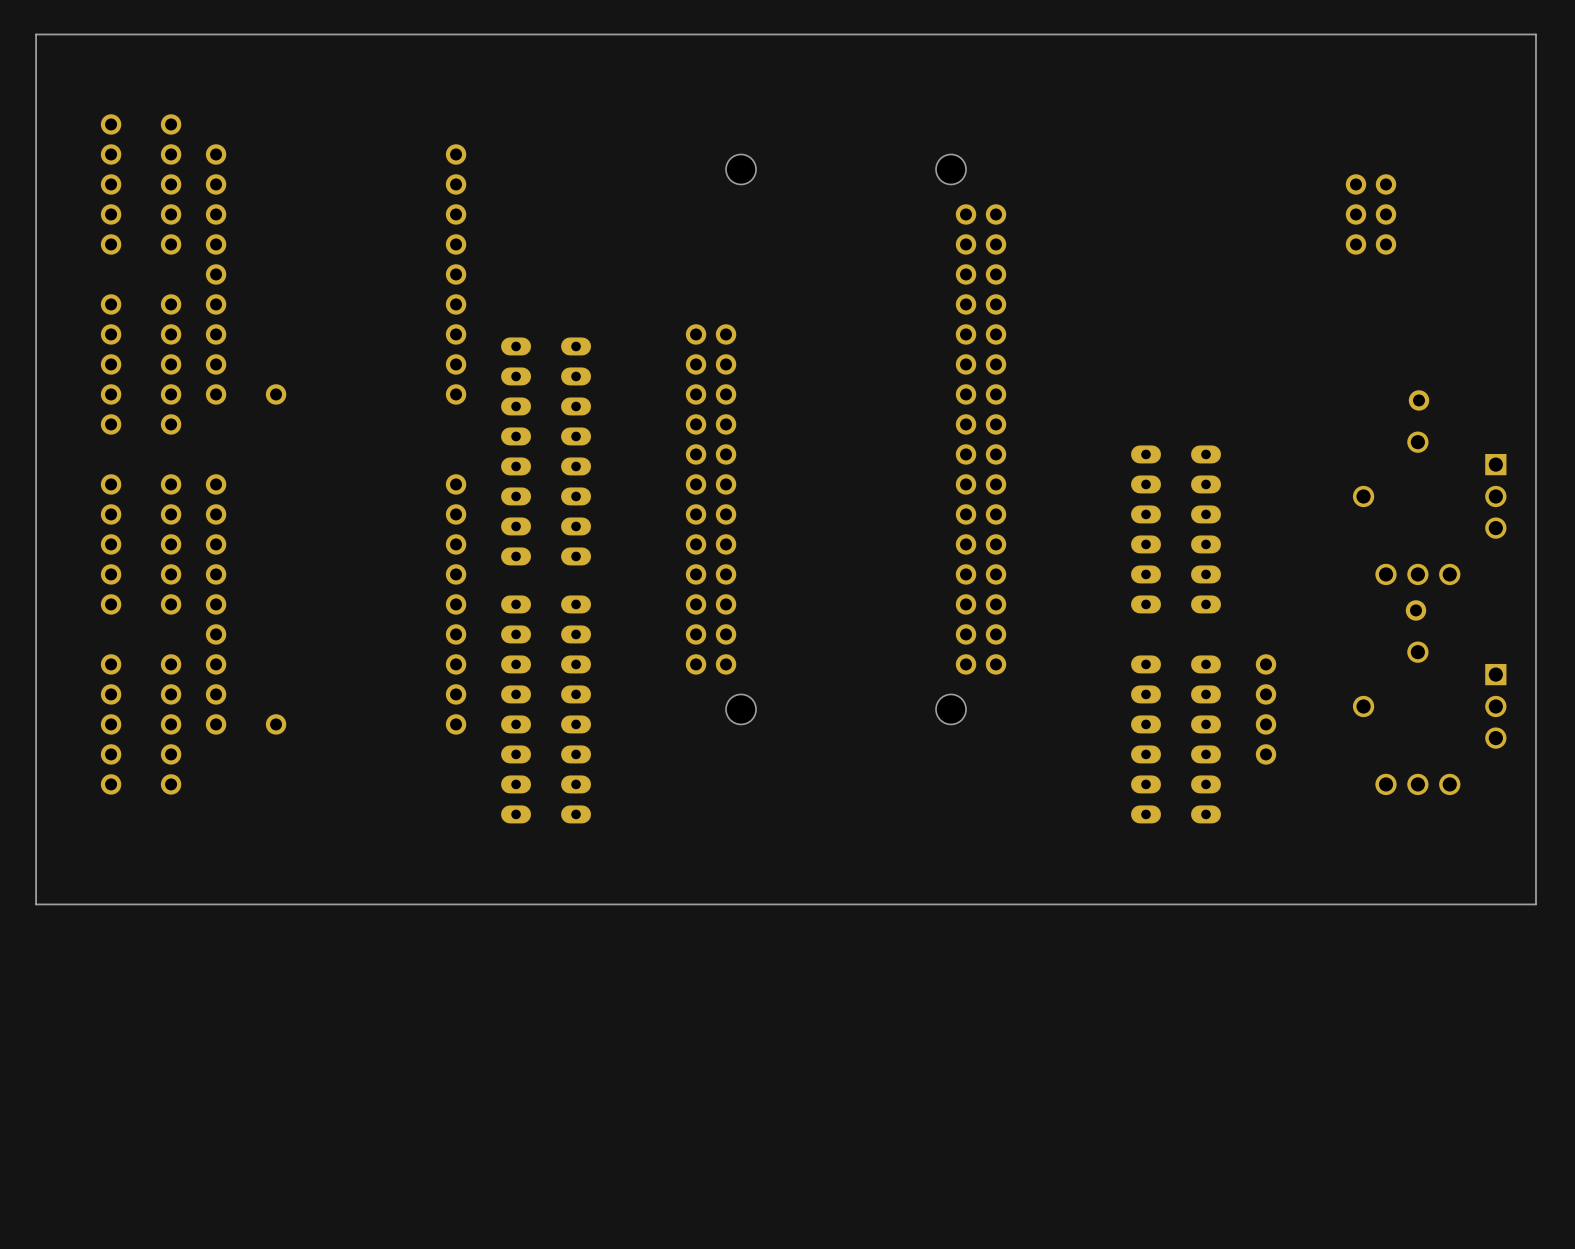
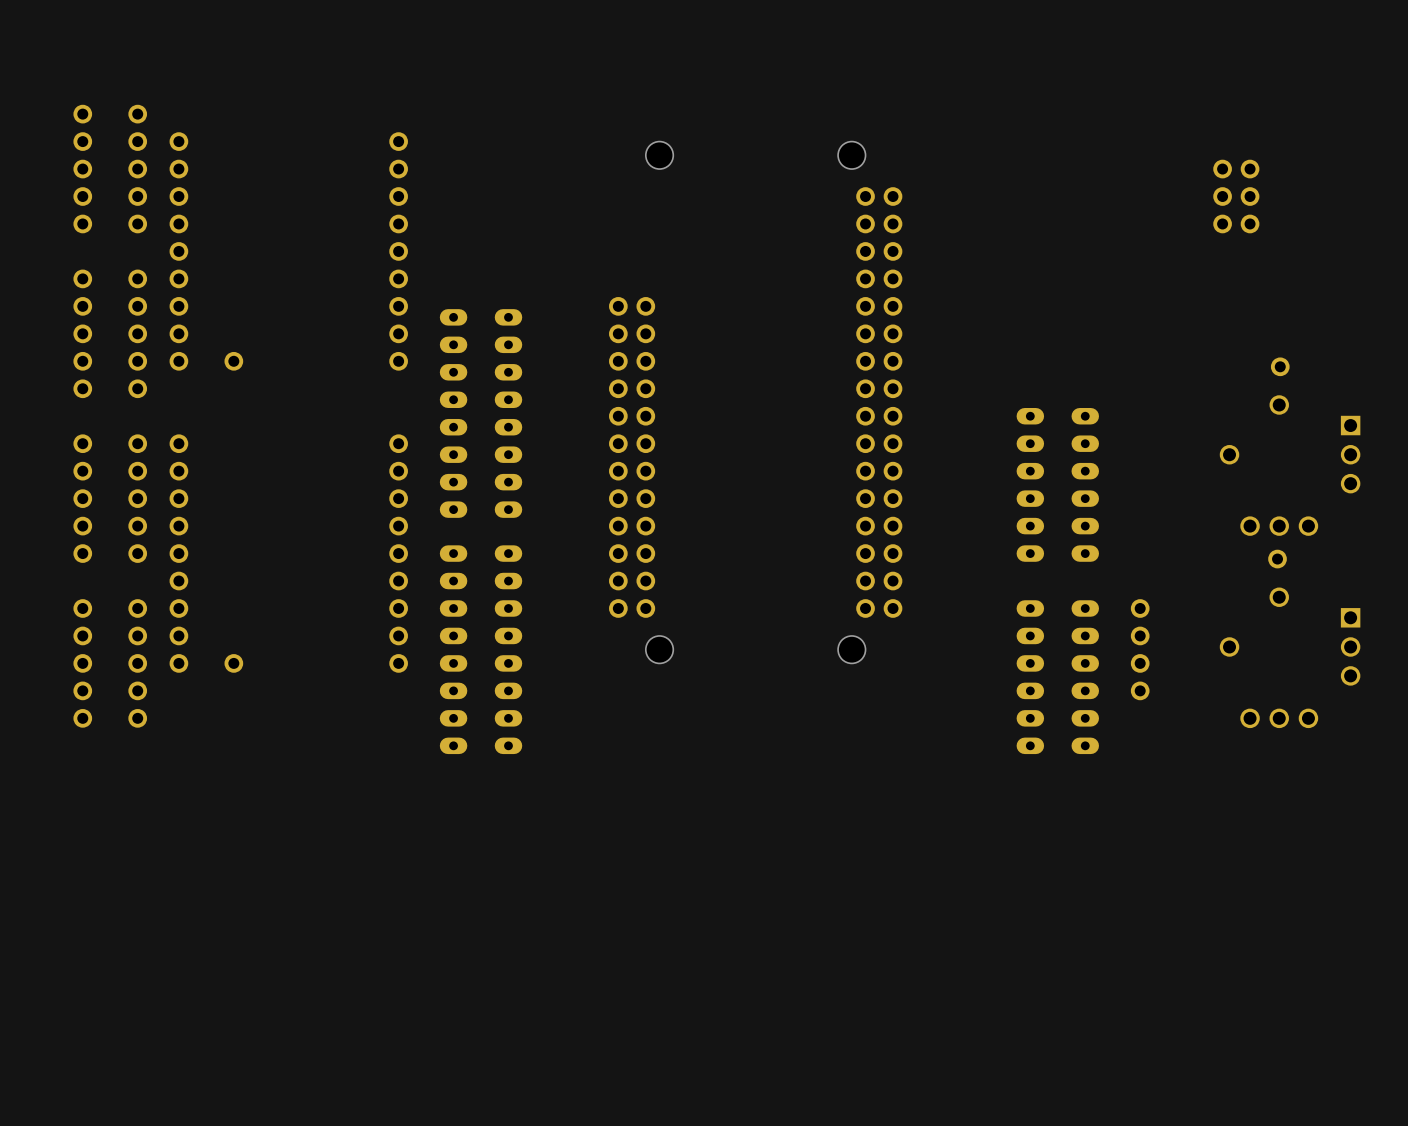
board edge: (1535, 34) (36, 34) (36, 904) (1535, 904) (1535, 34) -> none

